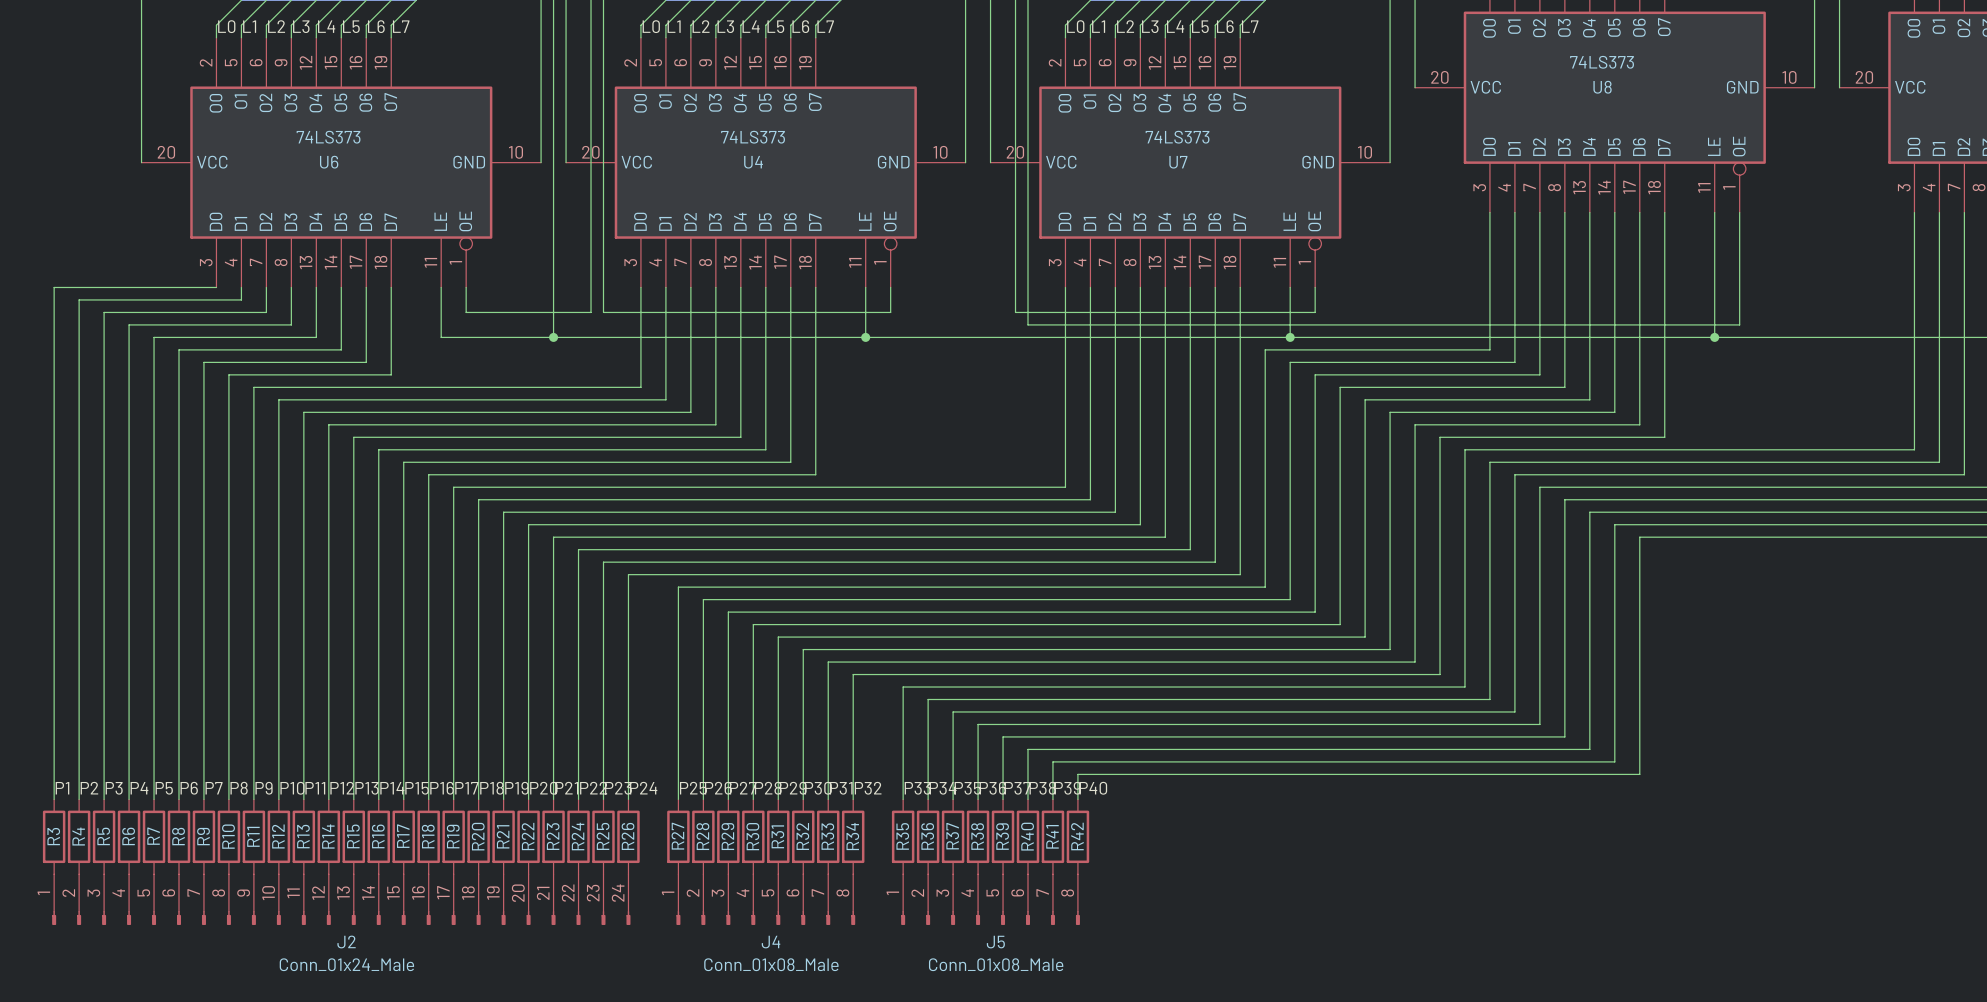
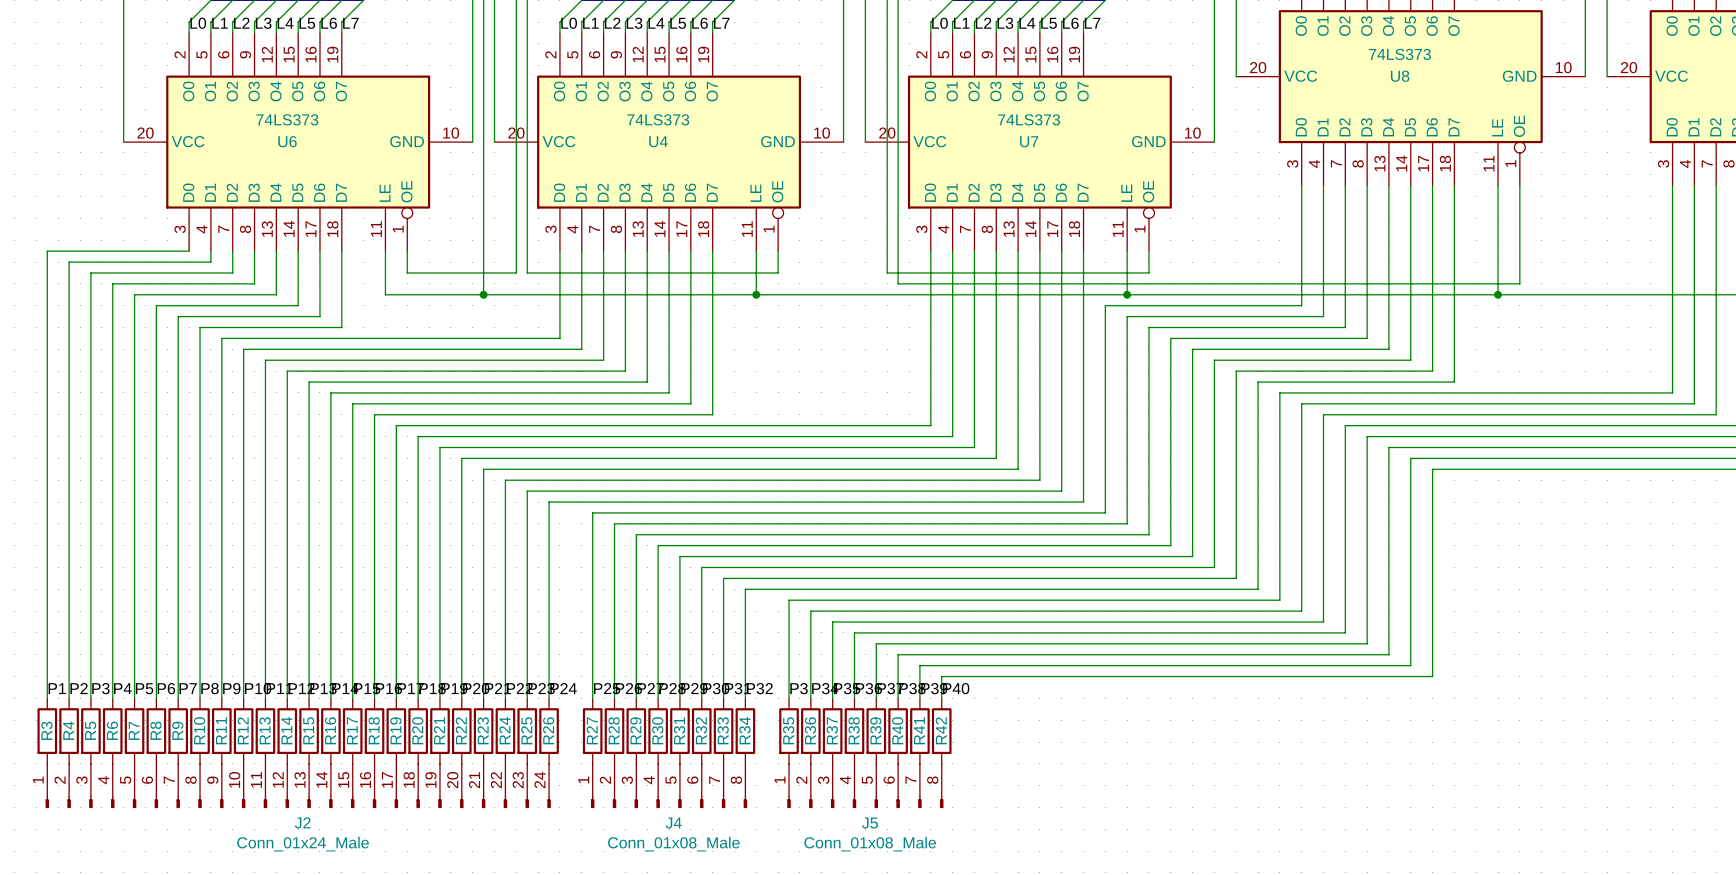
label: P33 (917, 788) -> P3 (799, 688)

